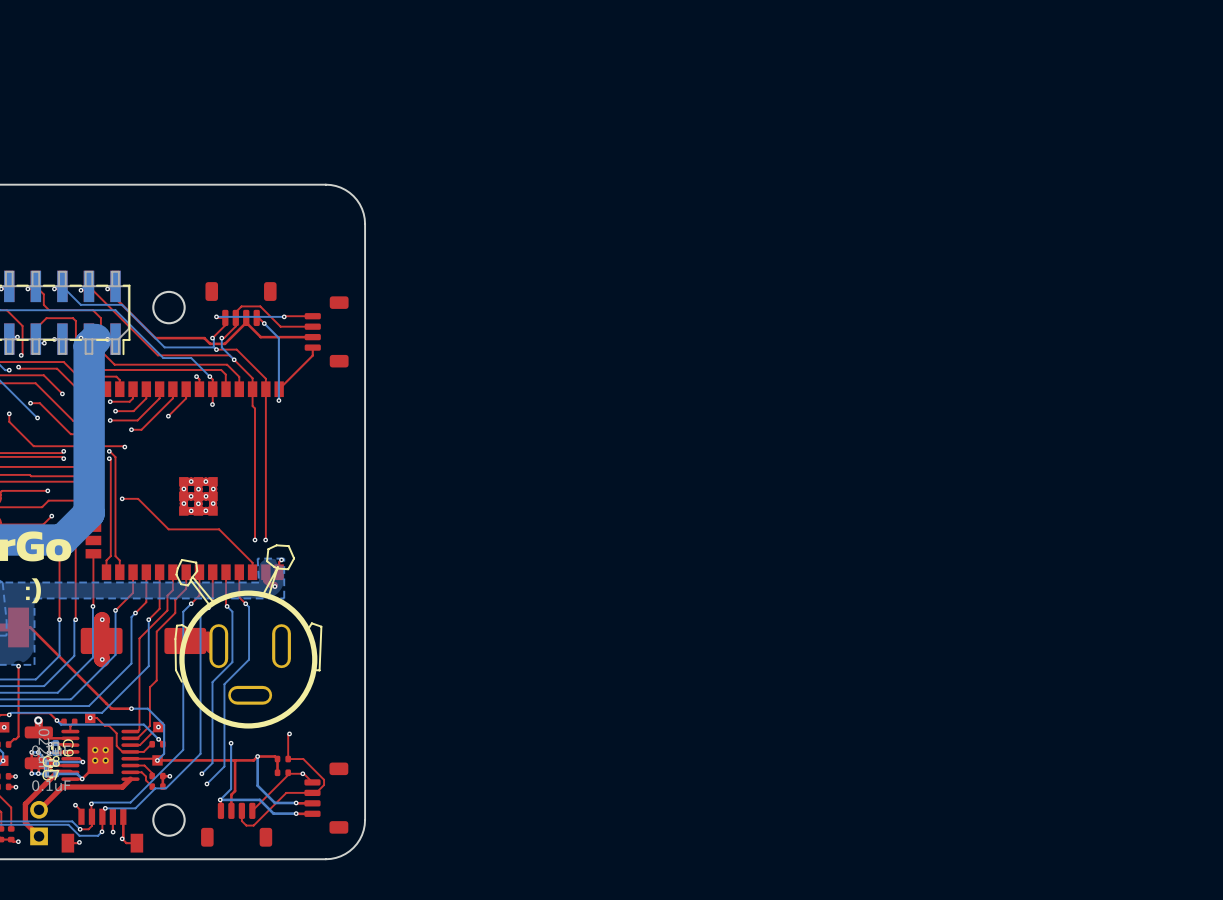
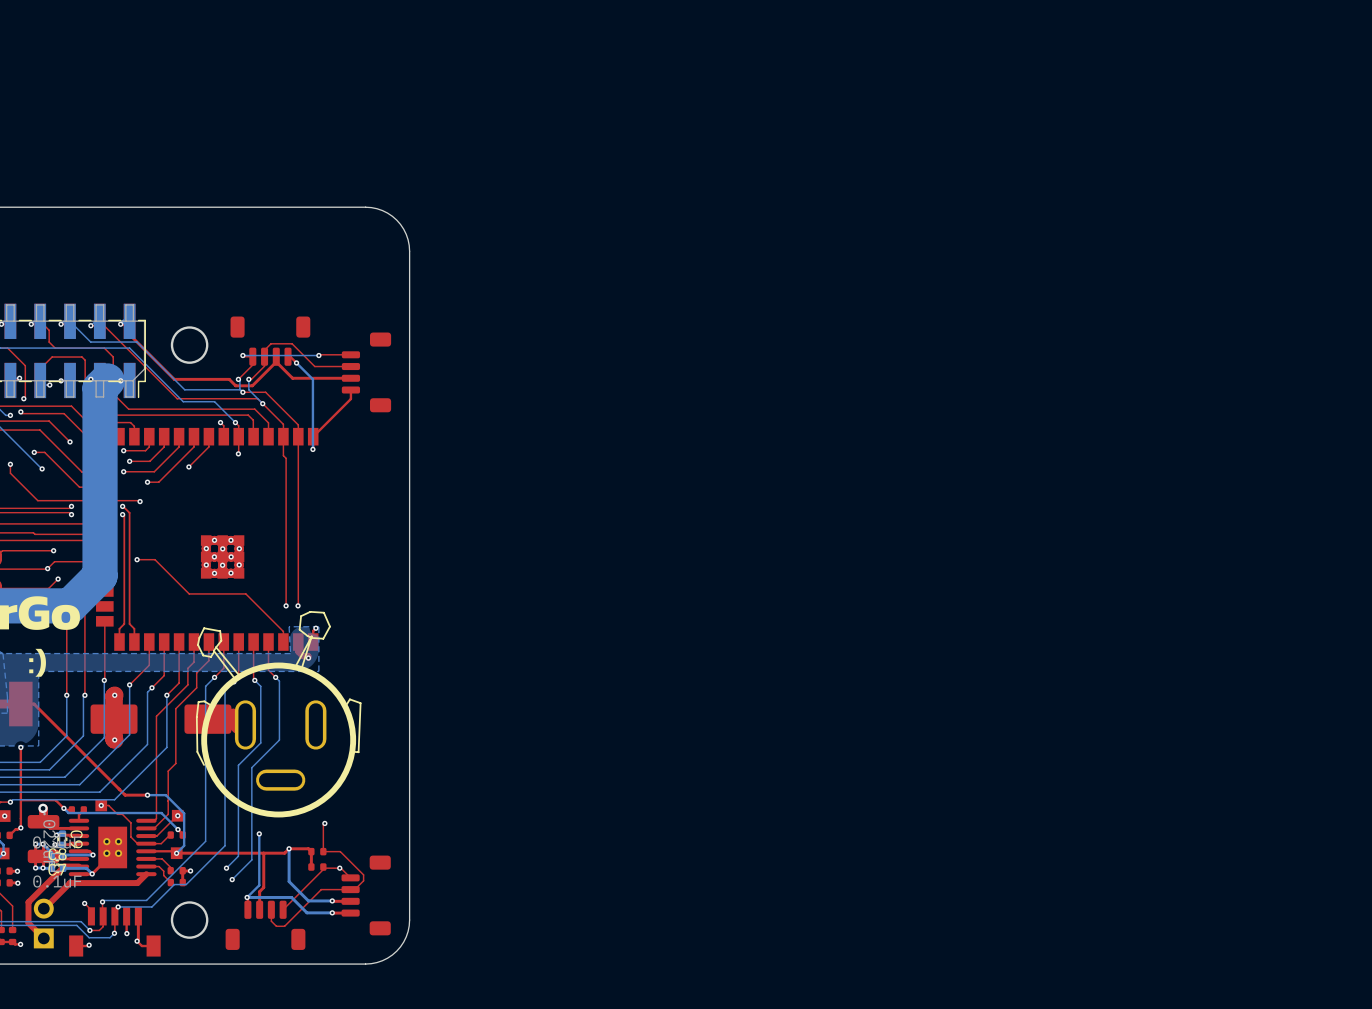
via: none -> (47, 568)
via: none -> (20, 827)

